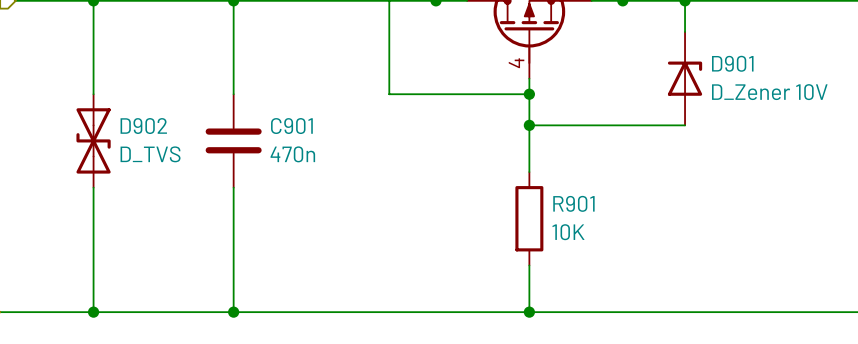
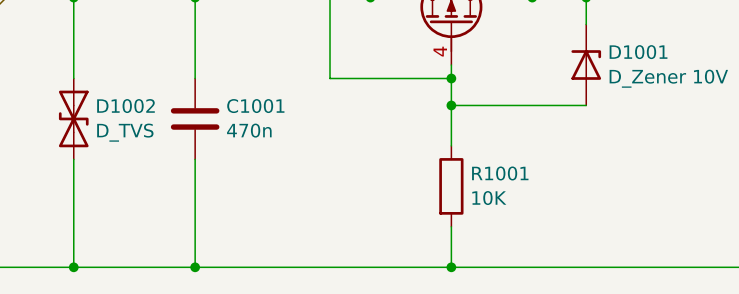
D901 name: D901 (732, 63) -> D1001 (638, 52)
D902 name: D902 (143, 126) -> D1002 (125, 106)
C901 name: C901 (291, 126) -> C1001 (255, 106)
R901 name: R901 (573, 203) -> R1001 (500, 173)

